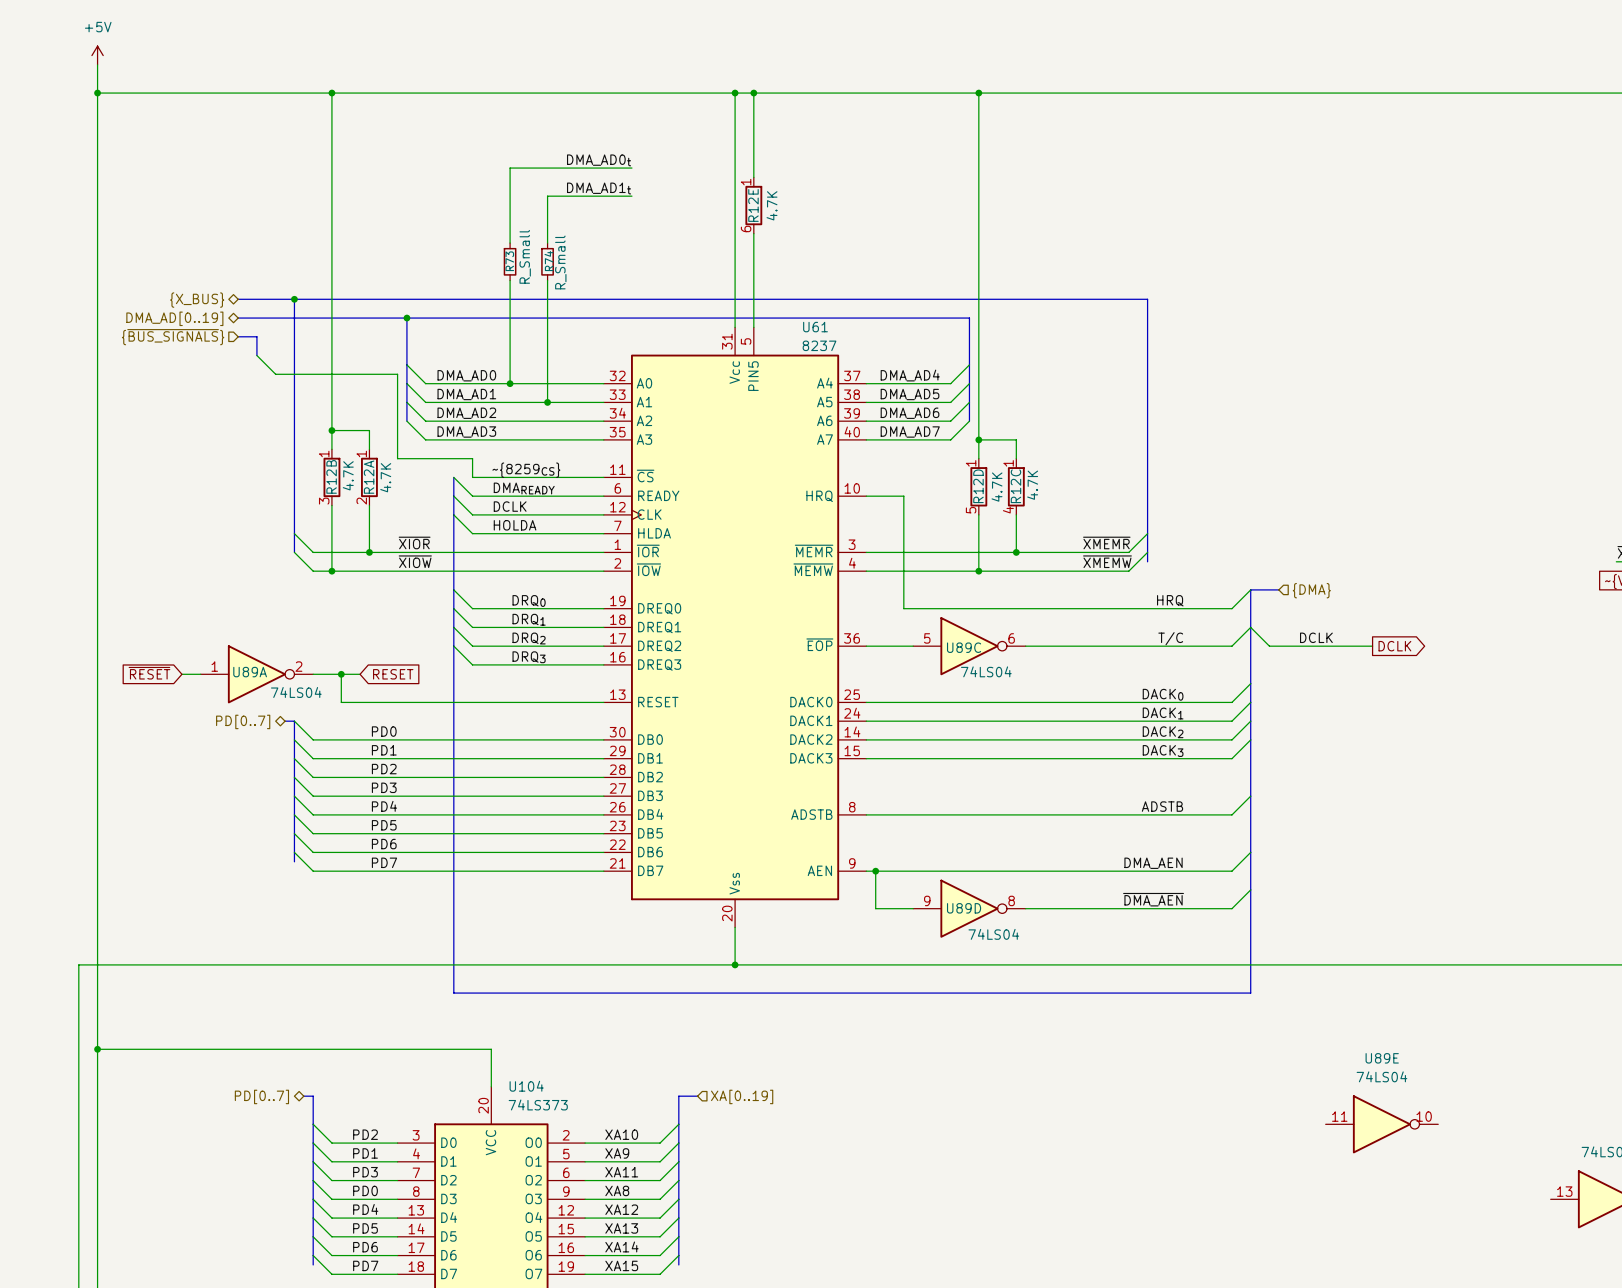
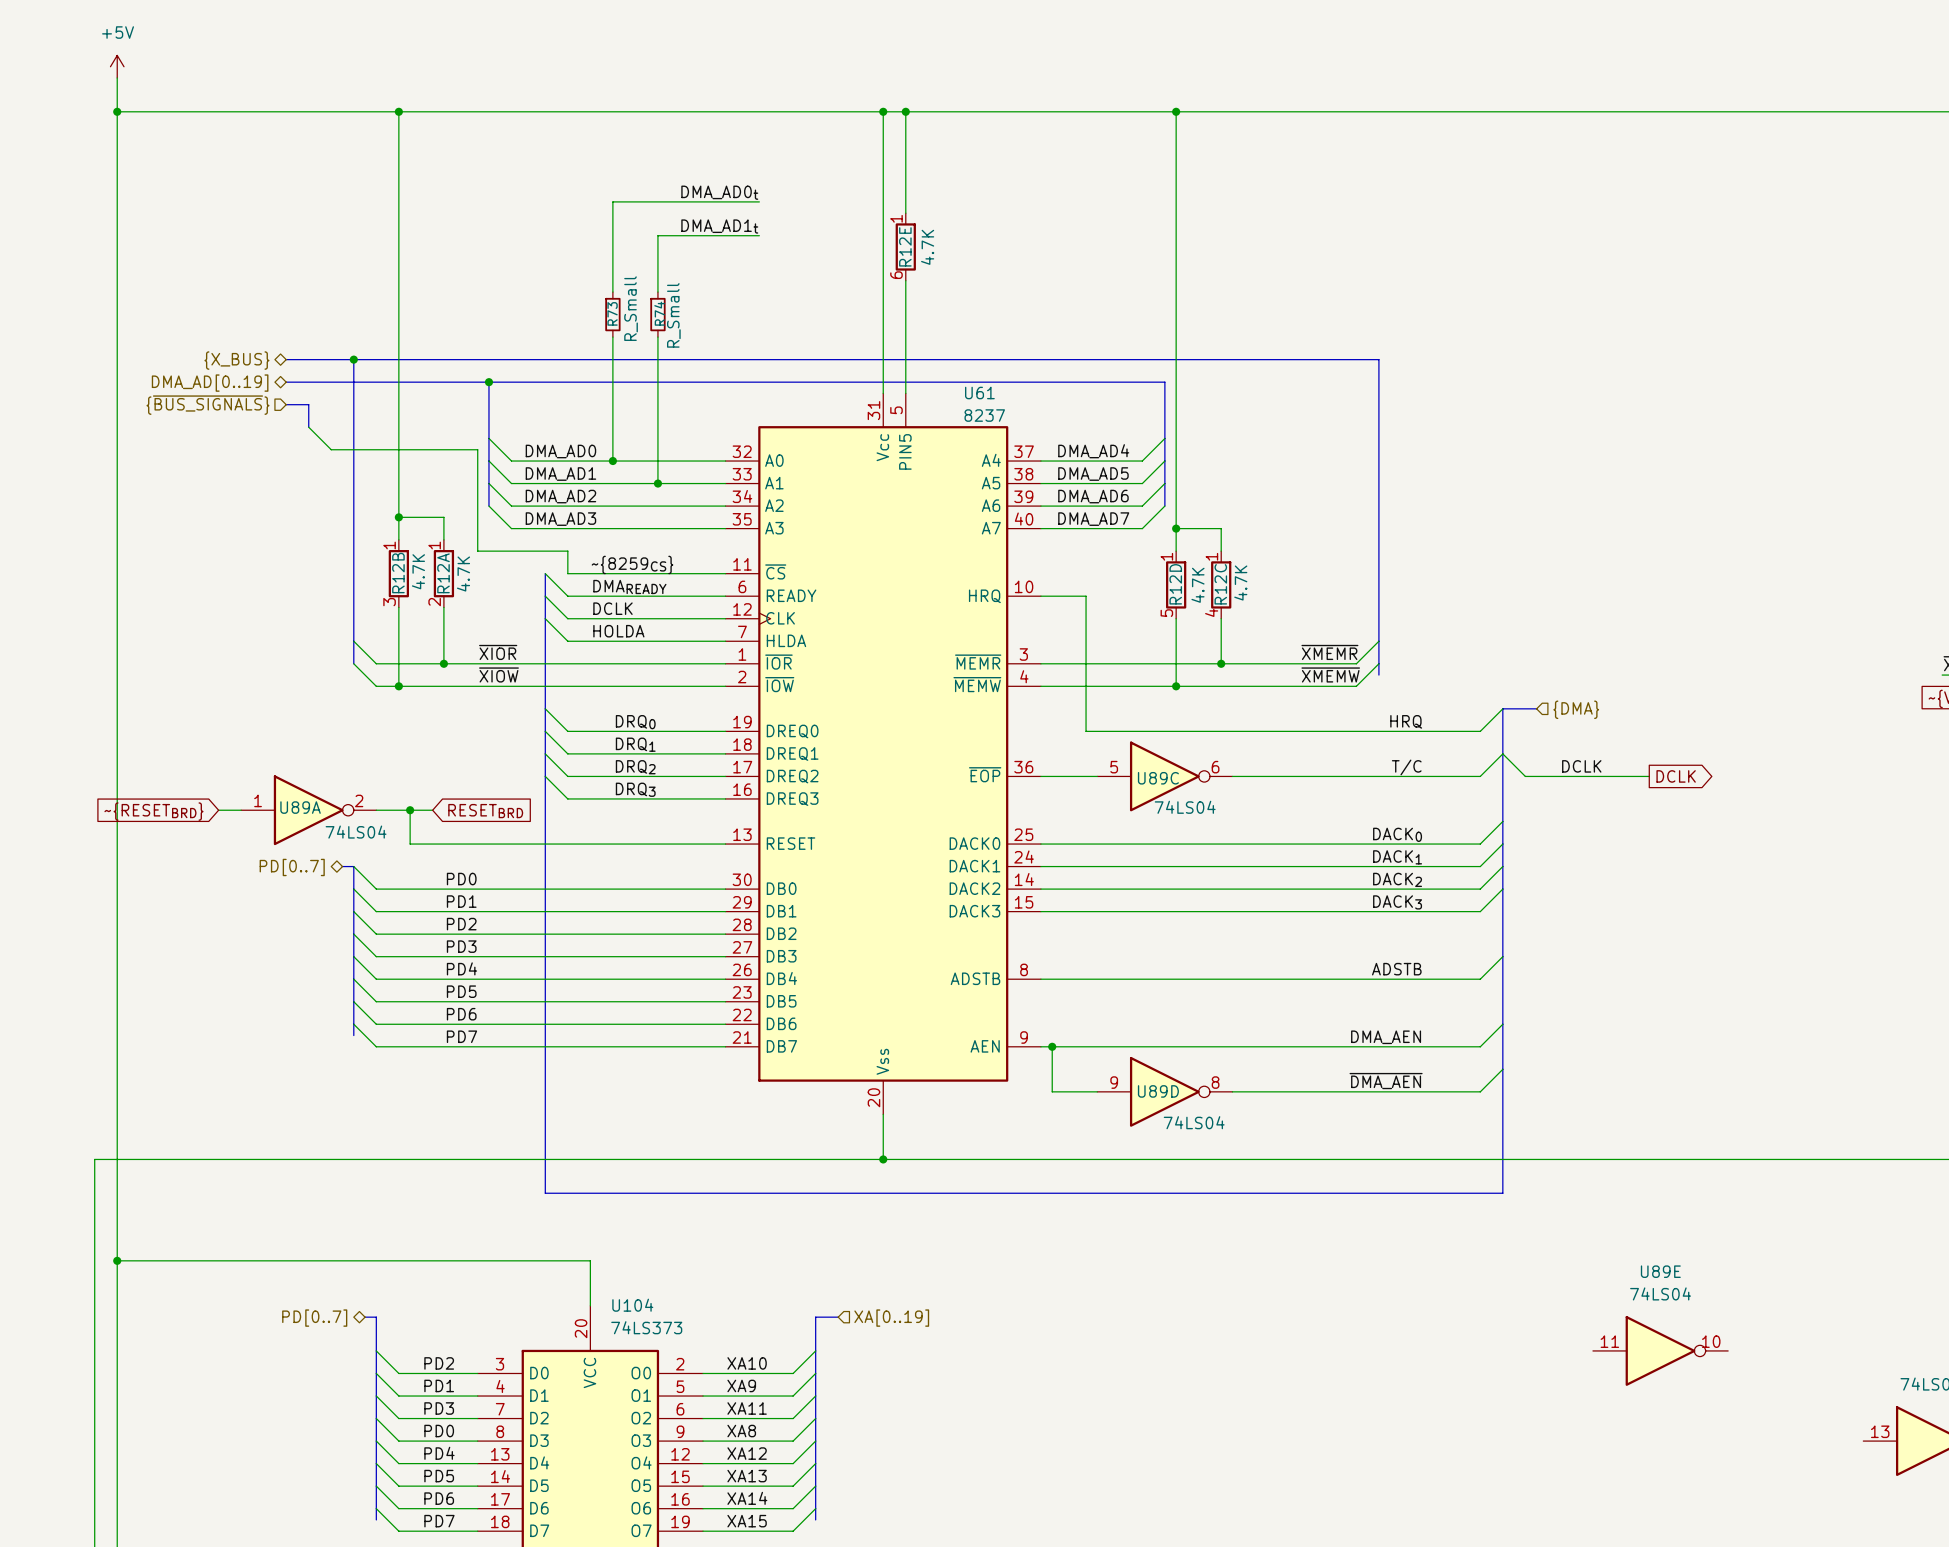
global label: ~{RESET} (149, 673) -> ~{RESETBRD} (153, 811)
global label: RESET (393, 674) -> RESETBRD (485, 811)

